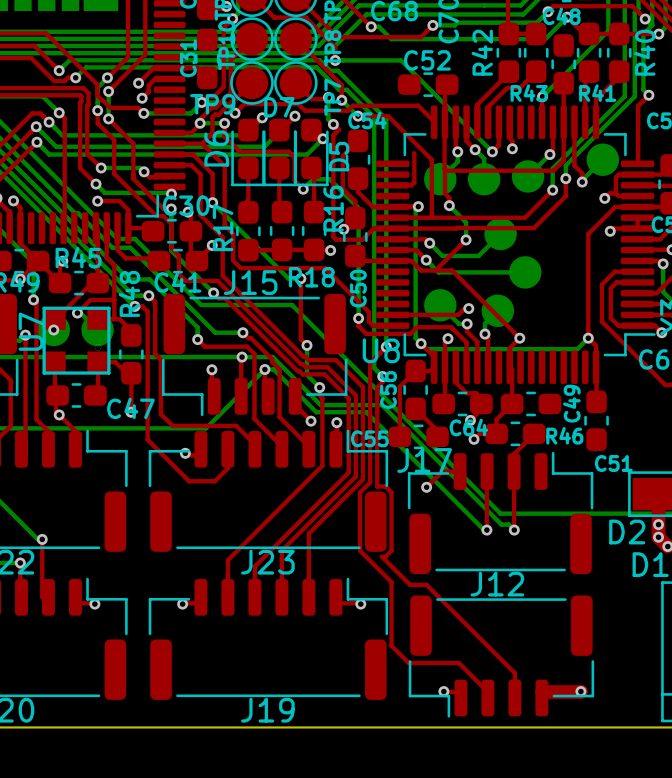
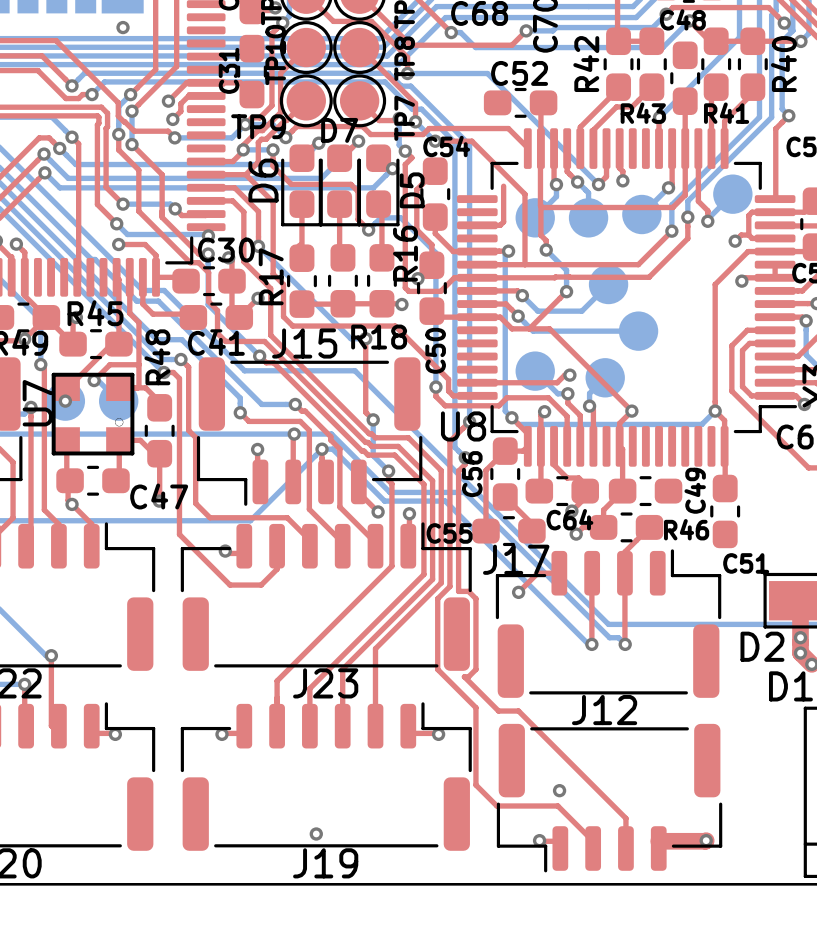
via: none -> (123, 27)
via: none -> (559, 790)
via: none -> (316, 833)

